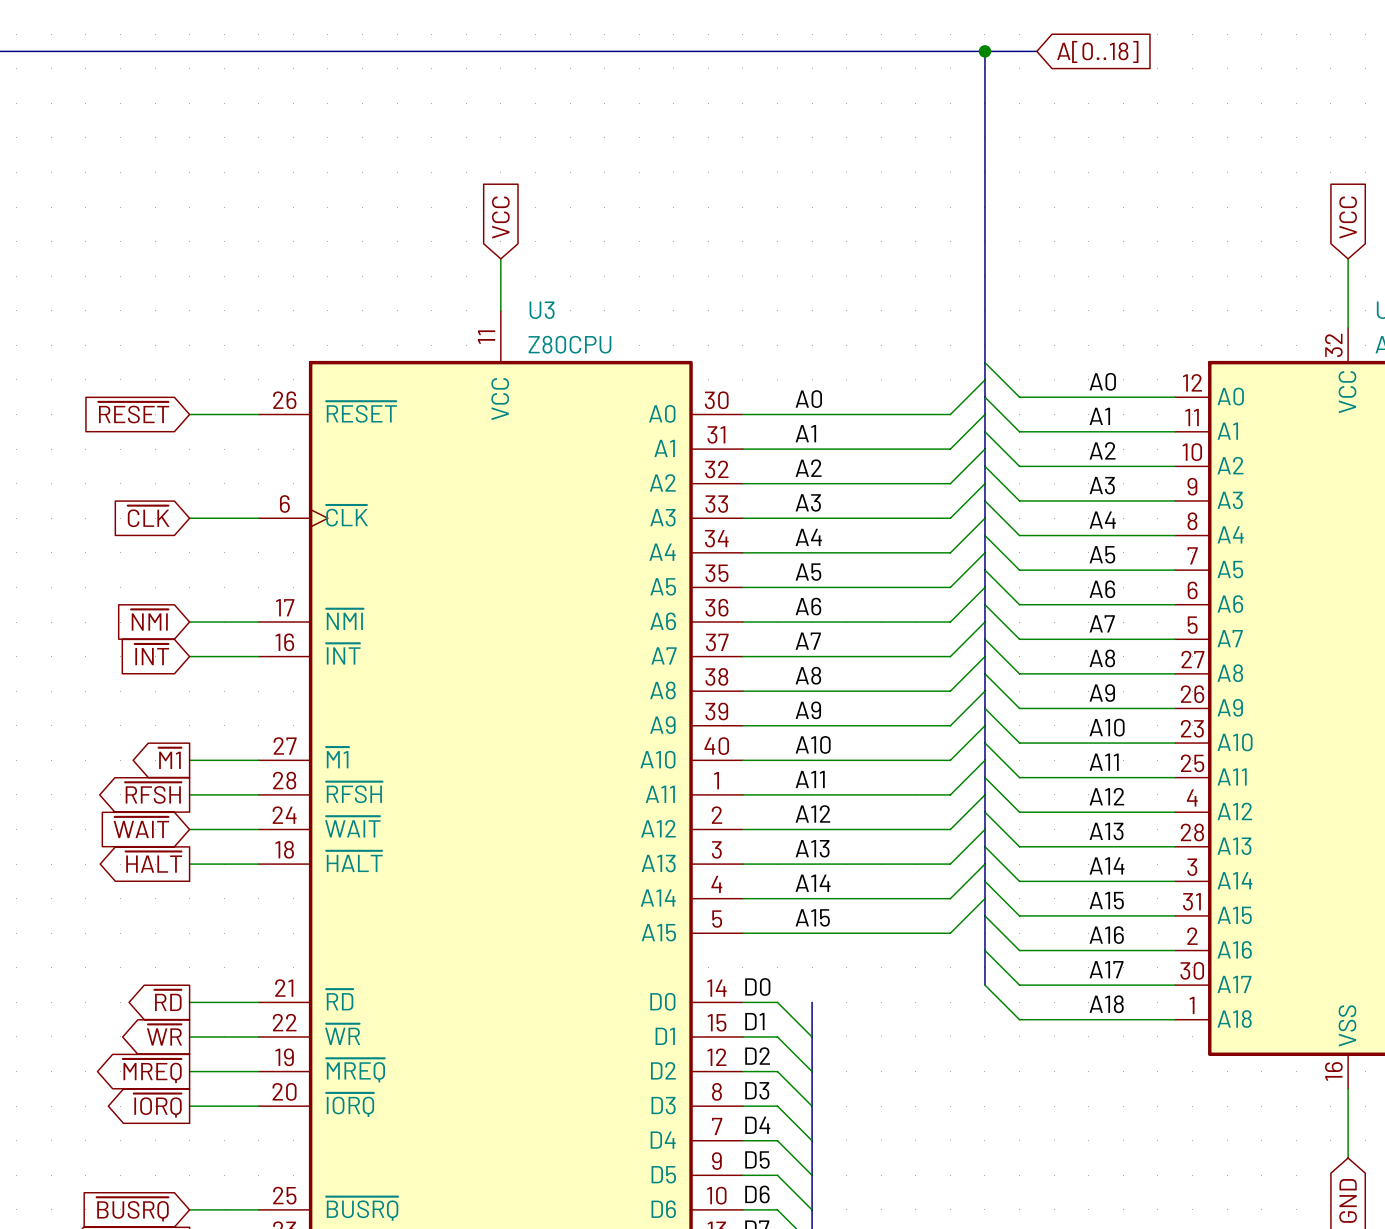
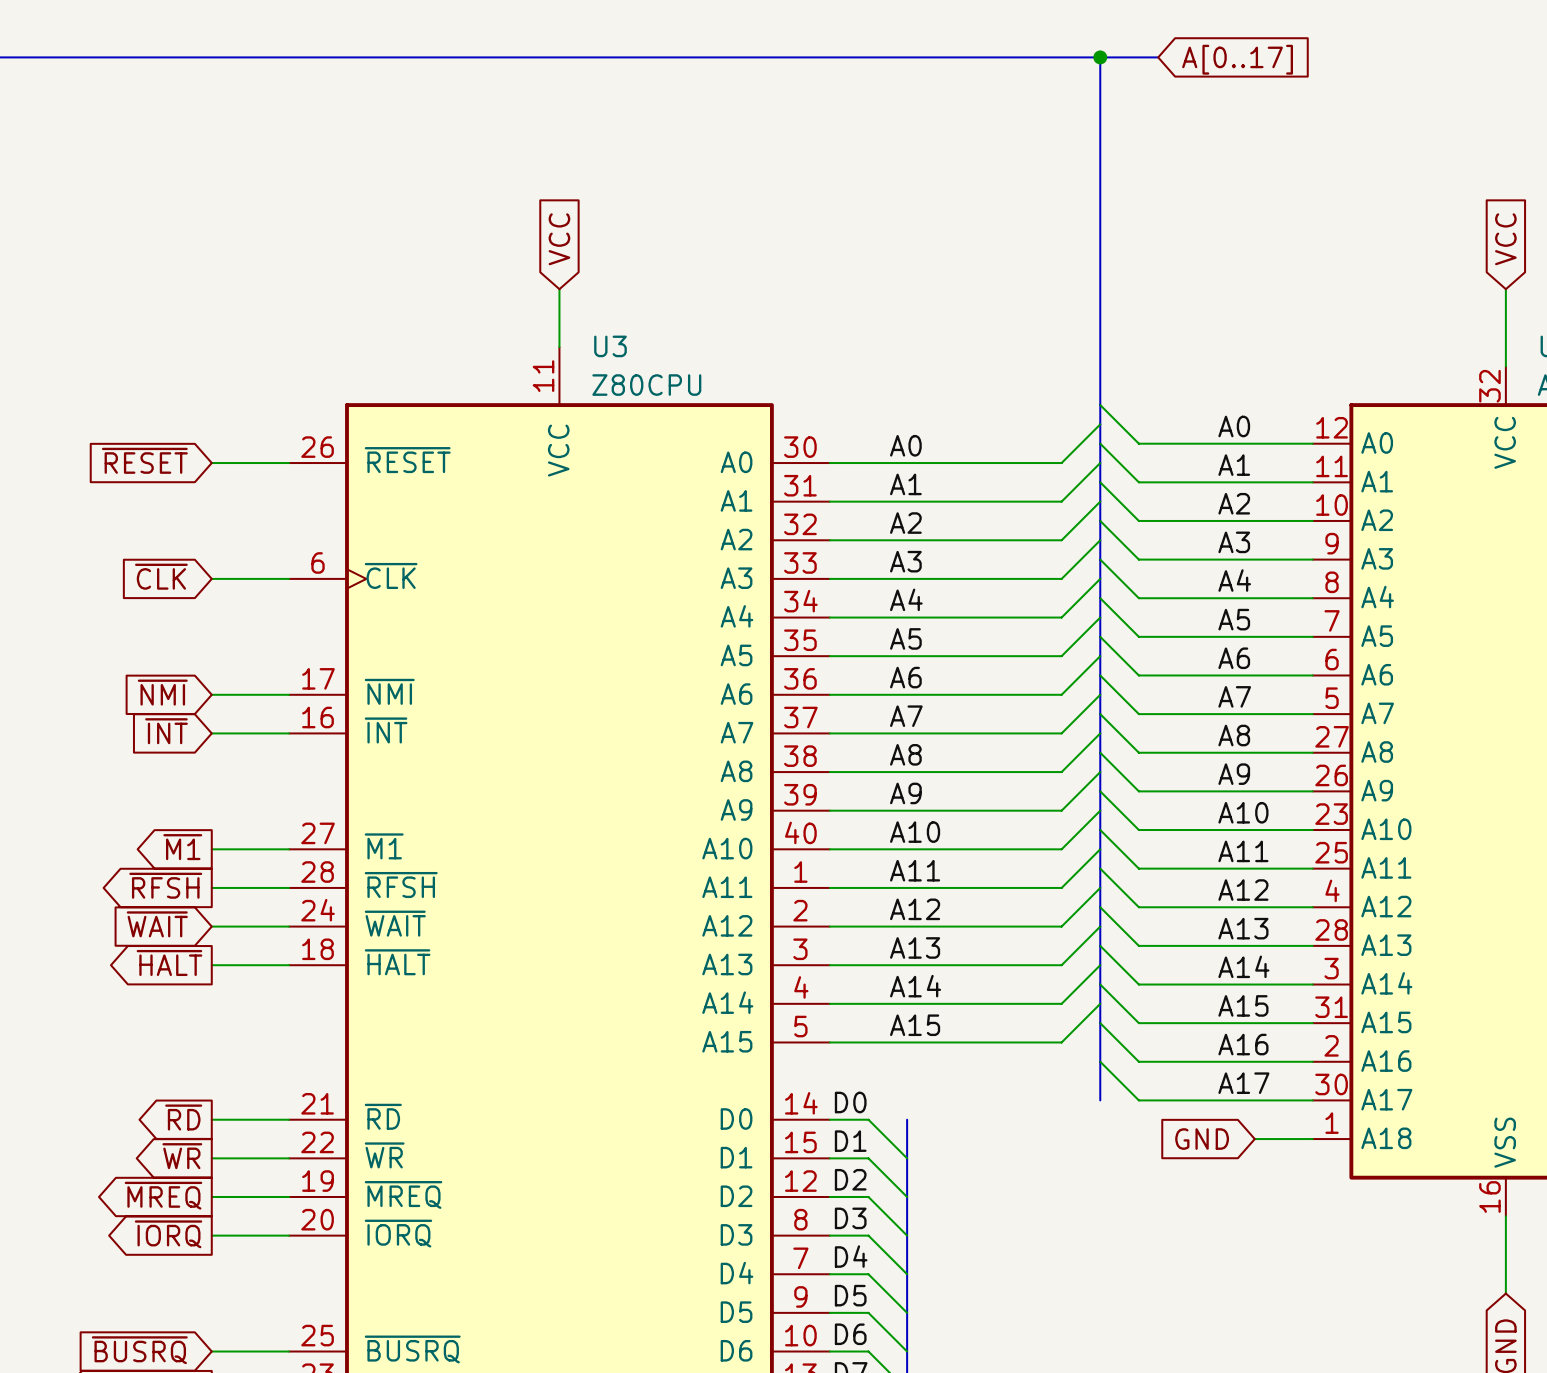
global label: A[0..18] (1097, 51) -> A[0..17] (1237, 59)
wire: (984, 985) (1019, 1019) (1123, 1019) -> none
label: A18 (1106, 1004) -> none
global label: none -> GND (1202, 1139)

